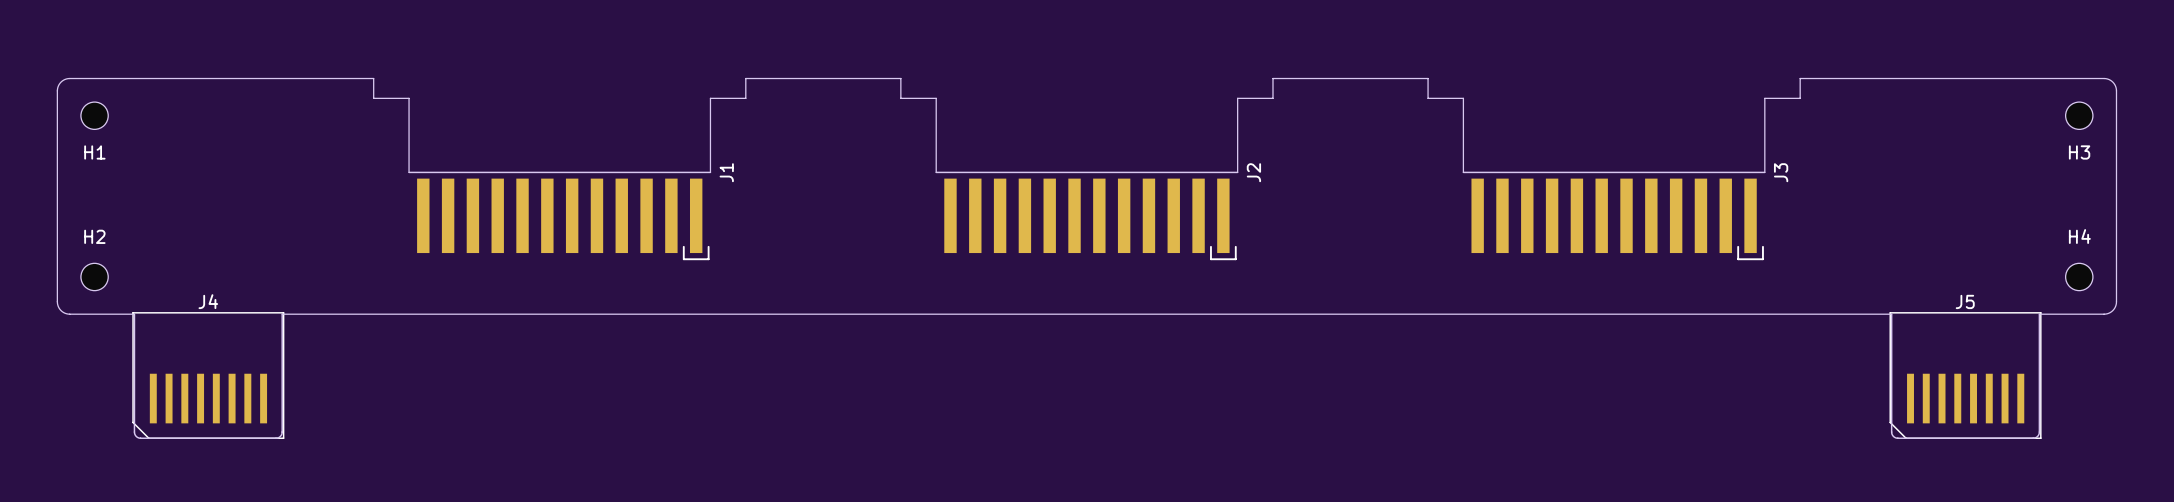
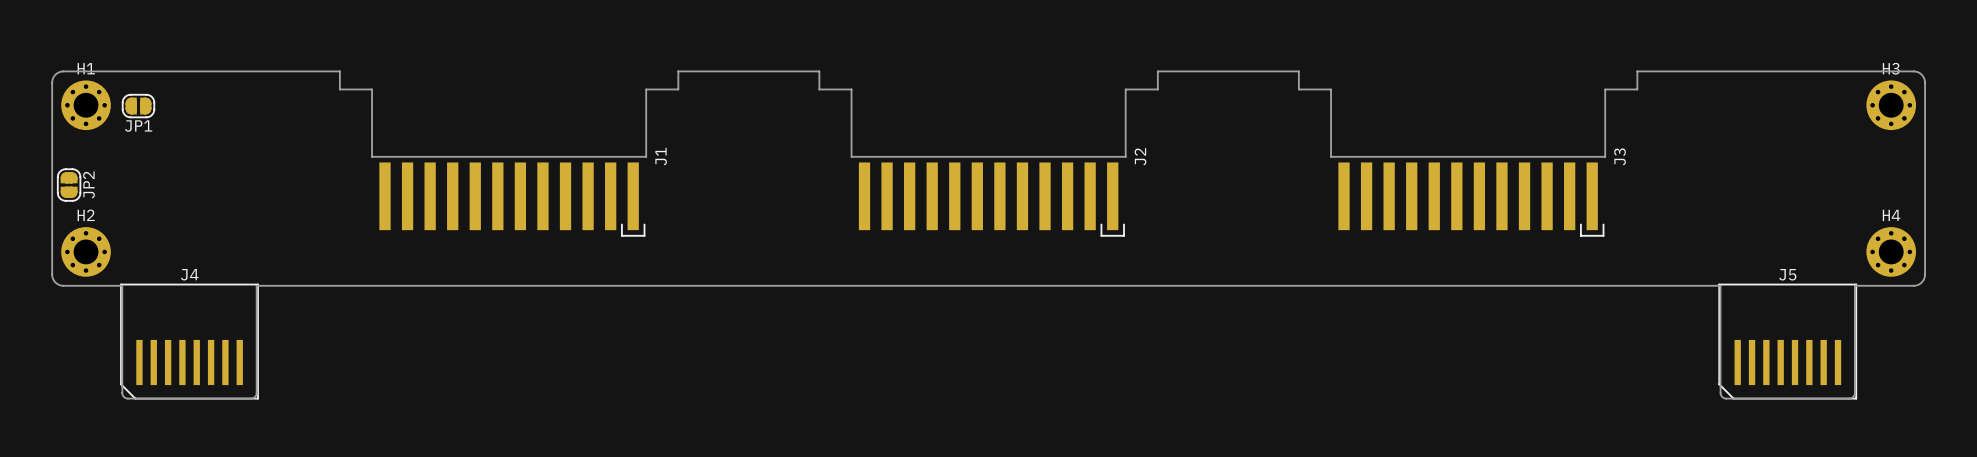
H1 footprint: [80, 102, 109, 130] -> [61, 80, 111, 131]
H3 footprint: [2065, 102, 2093, 130] -> [1866, 80, 1917, 131]
JP1: none -> (138, 106)
H1 name position: H1 (94, 152) -> H1 (86, 68)
H3 name position: H3 (2079, 152) -> H3 (1891, 68)
JP2: none -> (69, 185)
H2 footprint: [80, 263, 109, 291] -> [61, 227, 111, 277]
H4 footprint: [2065, 263, 2093, 291] -> [1866, 227, 1917, 277]

